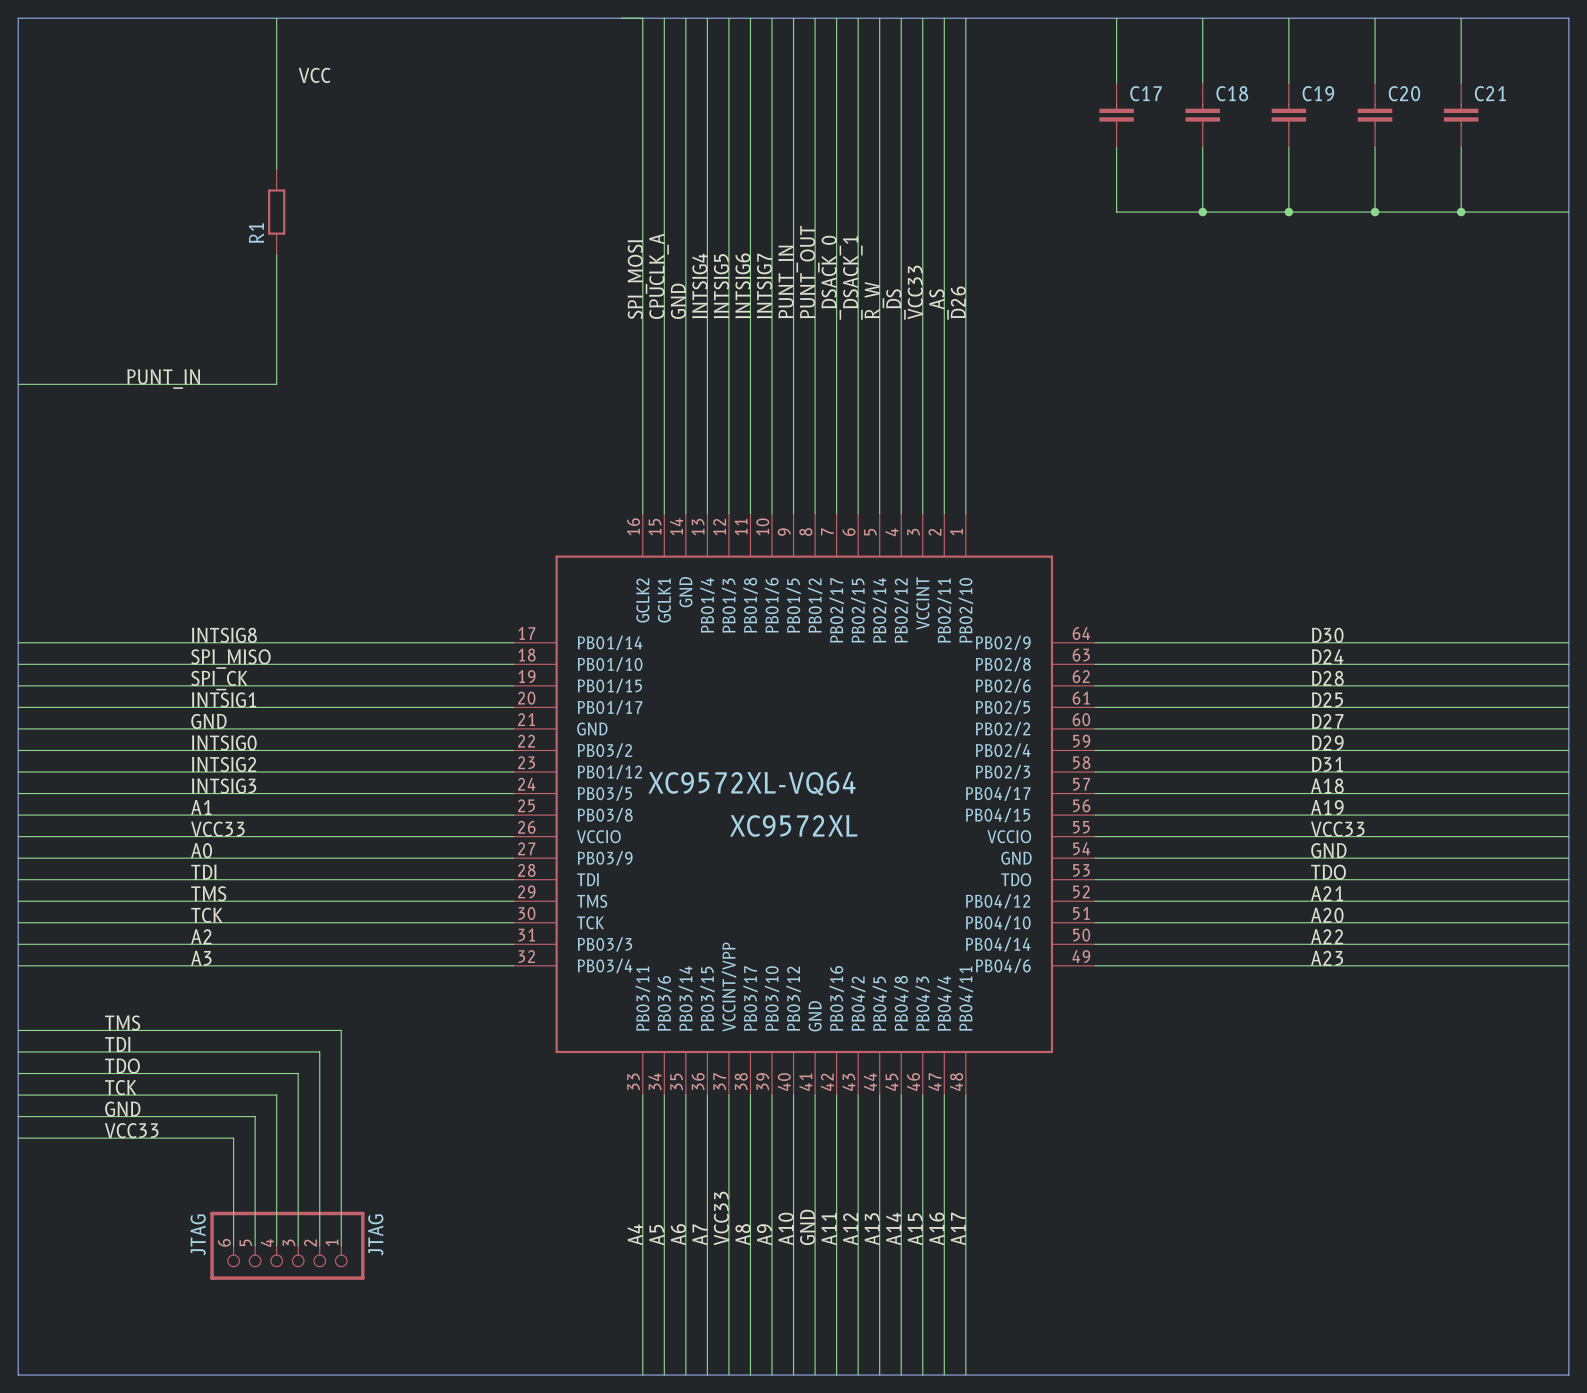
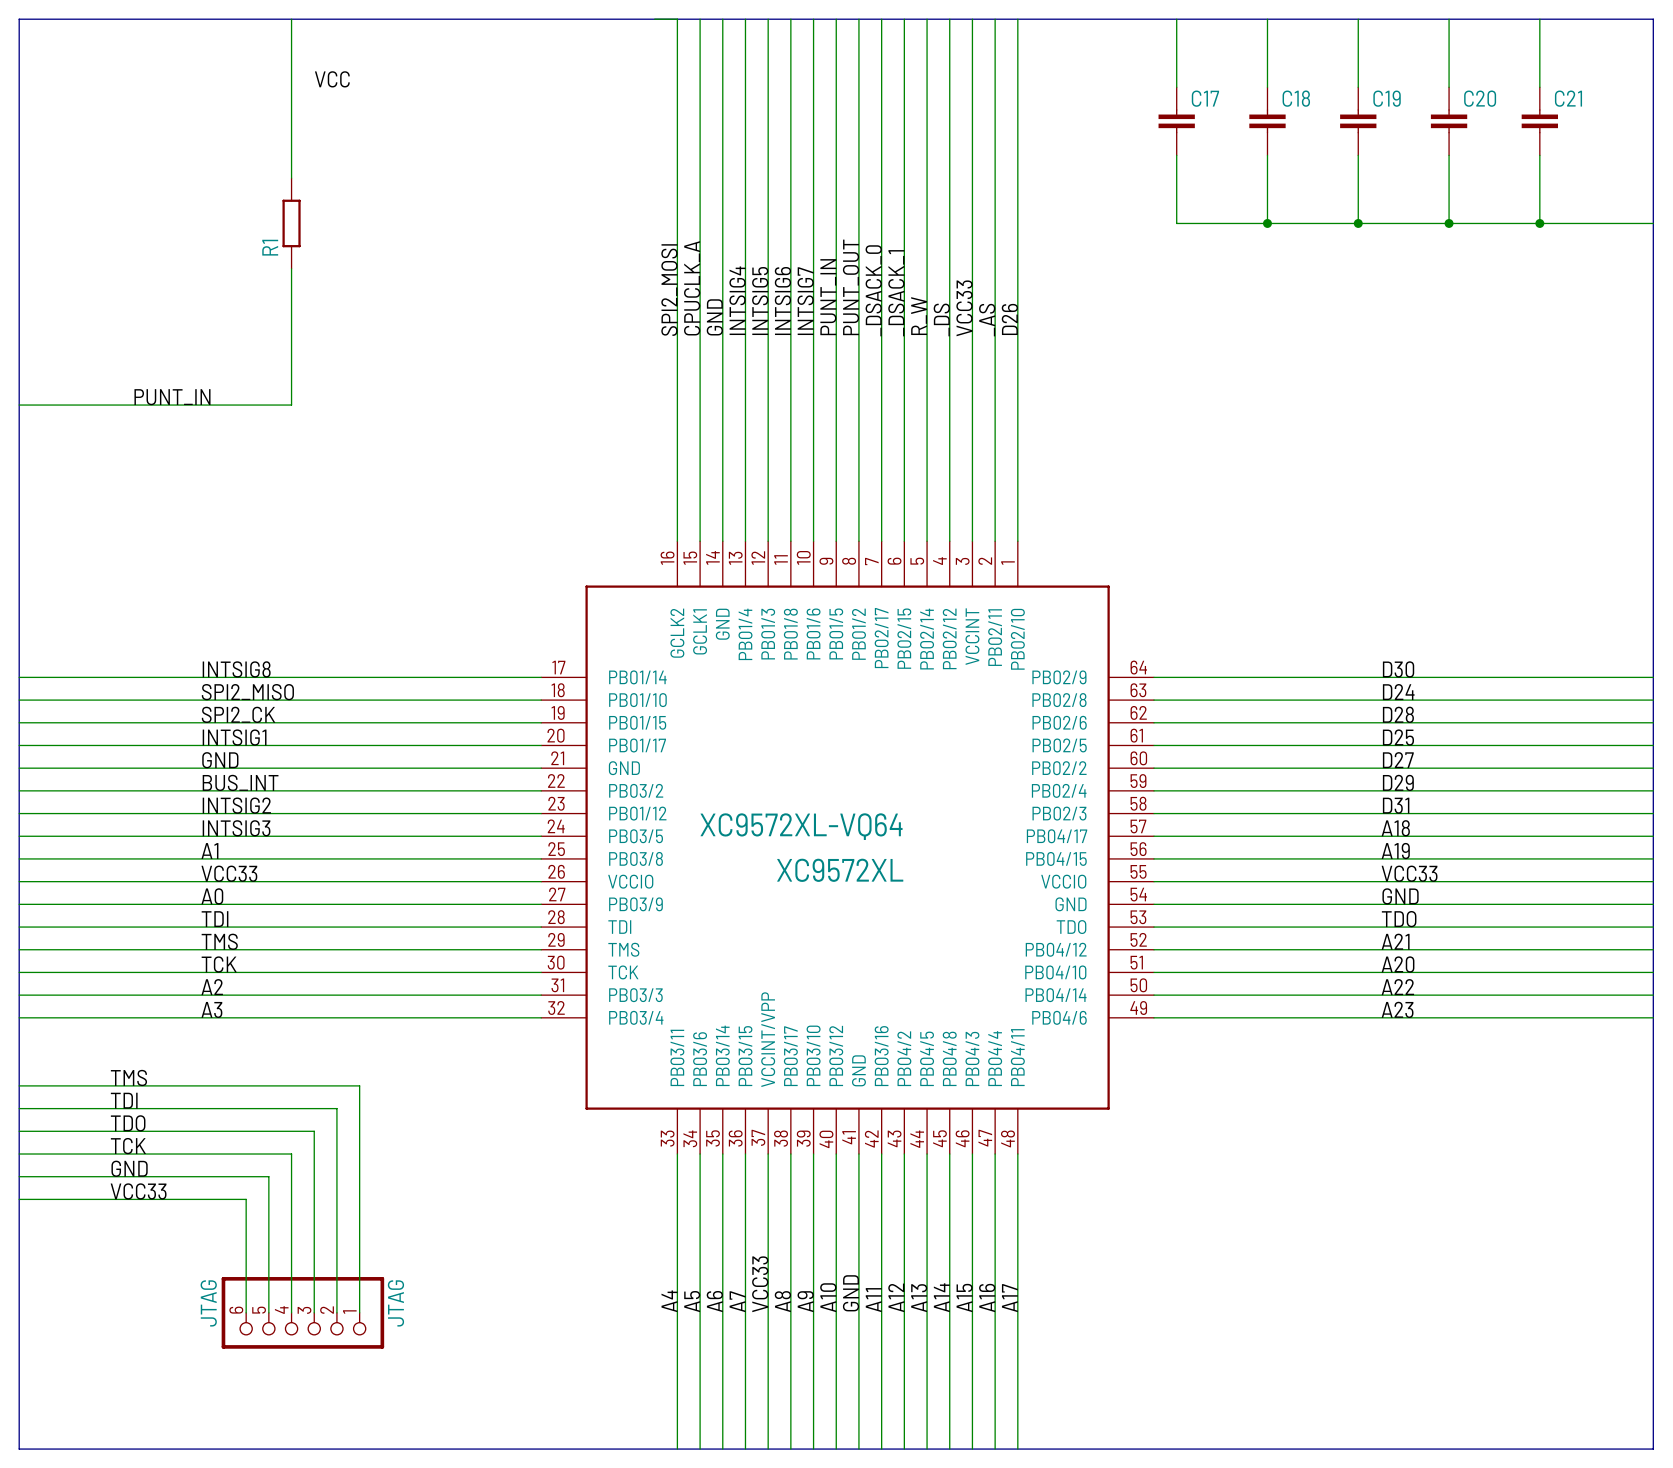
label: SPI_MOSI (637, 279) -> SPI2_MOSI (669, 290)
label: SPI_MISO (230, 659) -> SPI2_MISO (247, 692)
label: SPI_CK (219, 680) -> SPI2_CK (238, 714)
label: INTSIG0 (224, 743) -> BUS_INT (240, 782)

